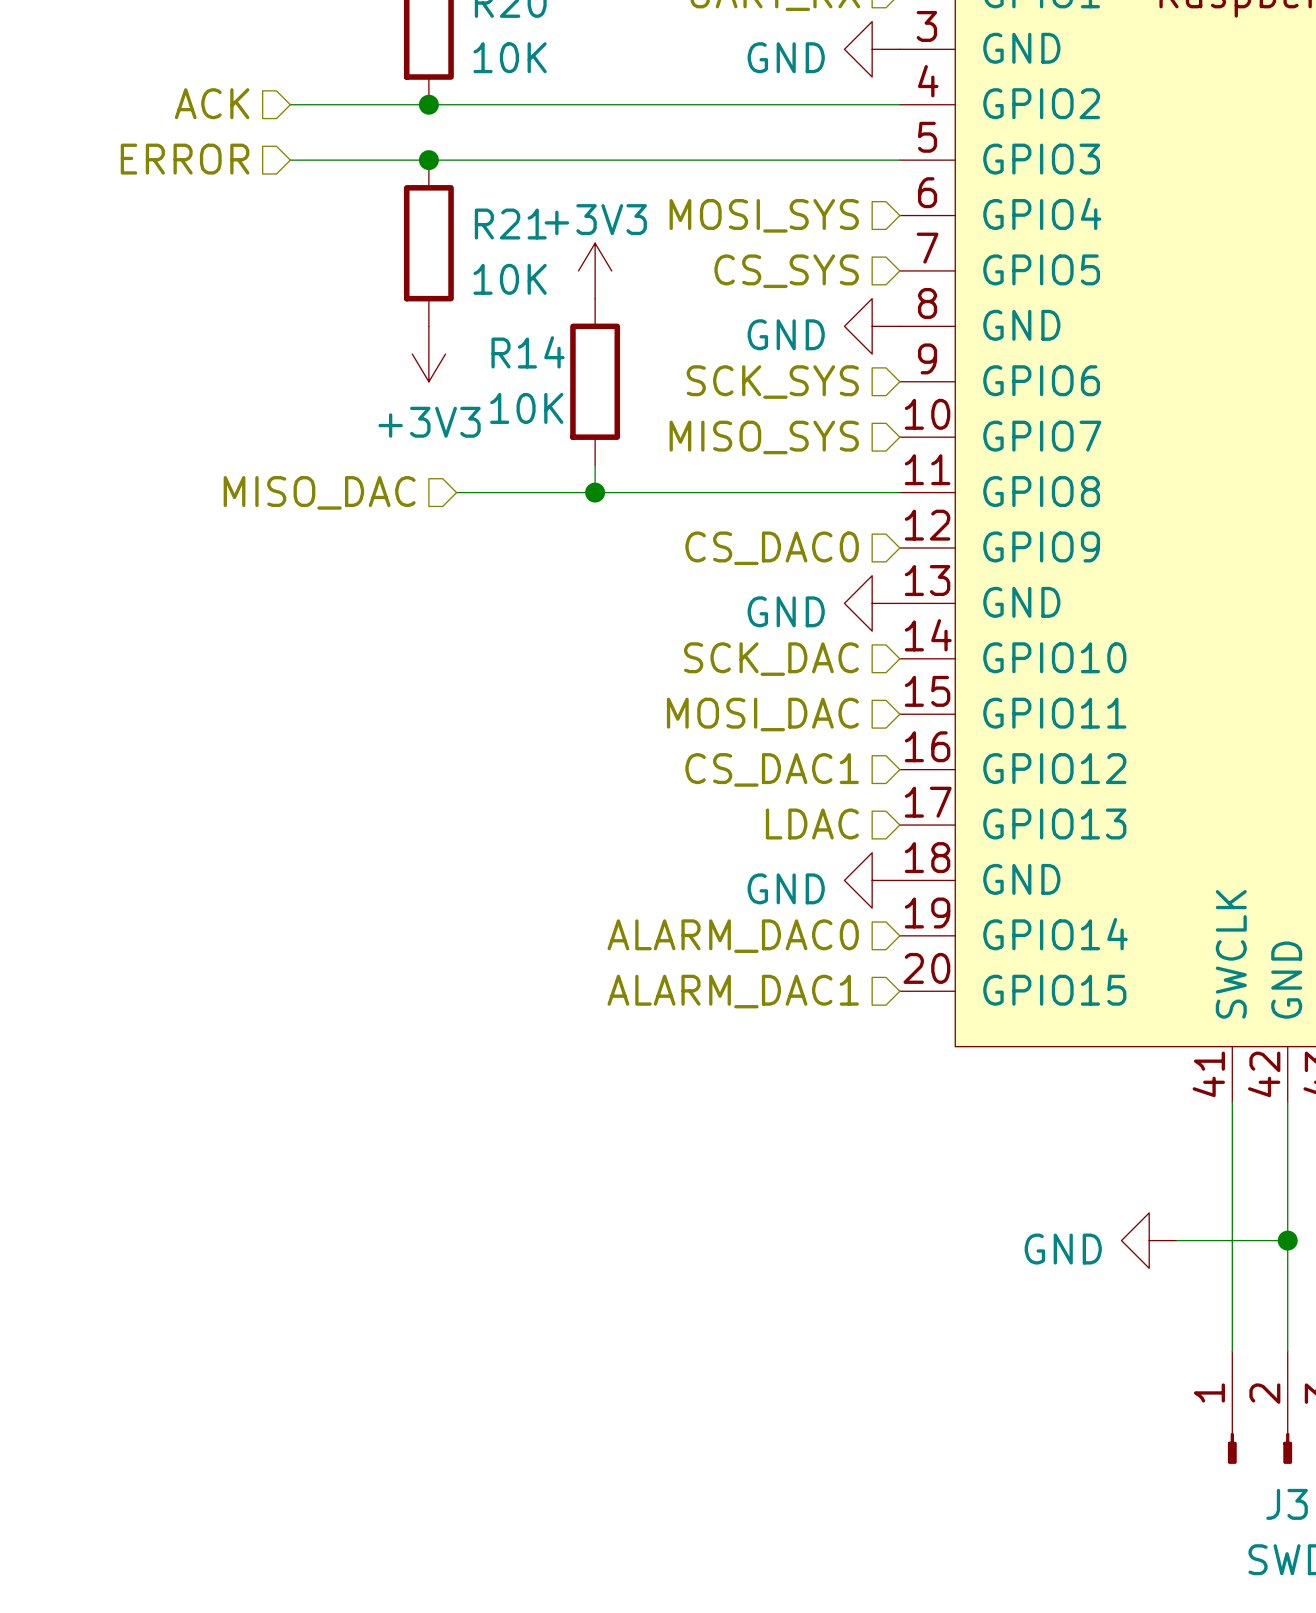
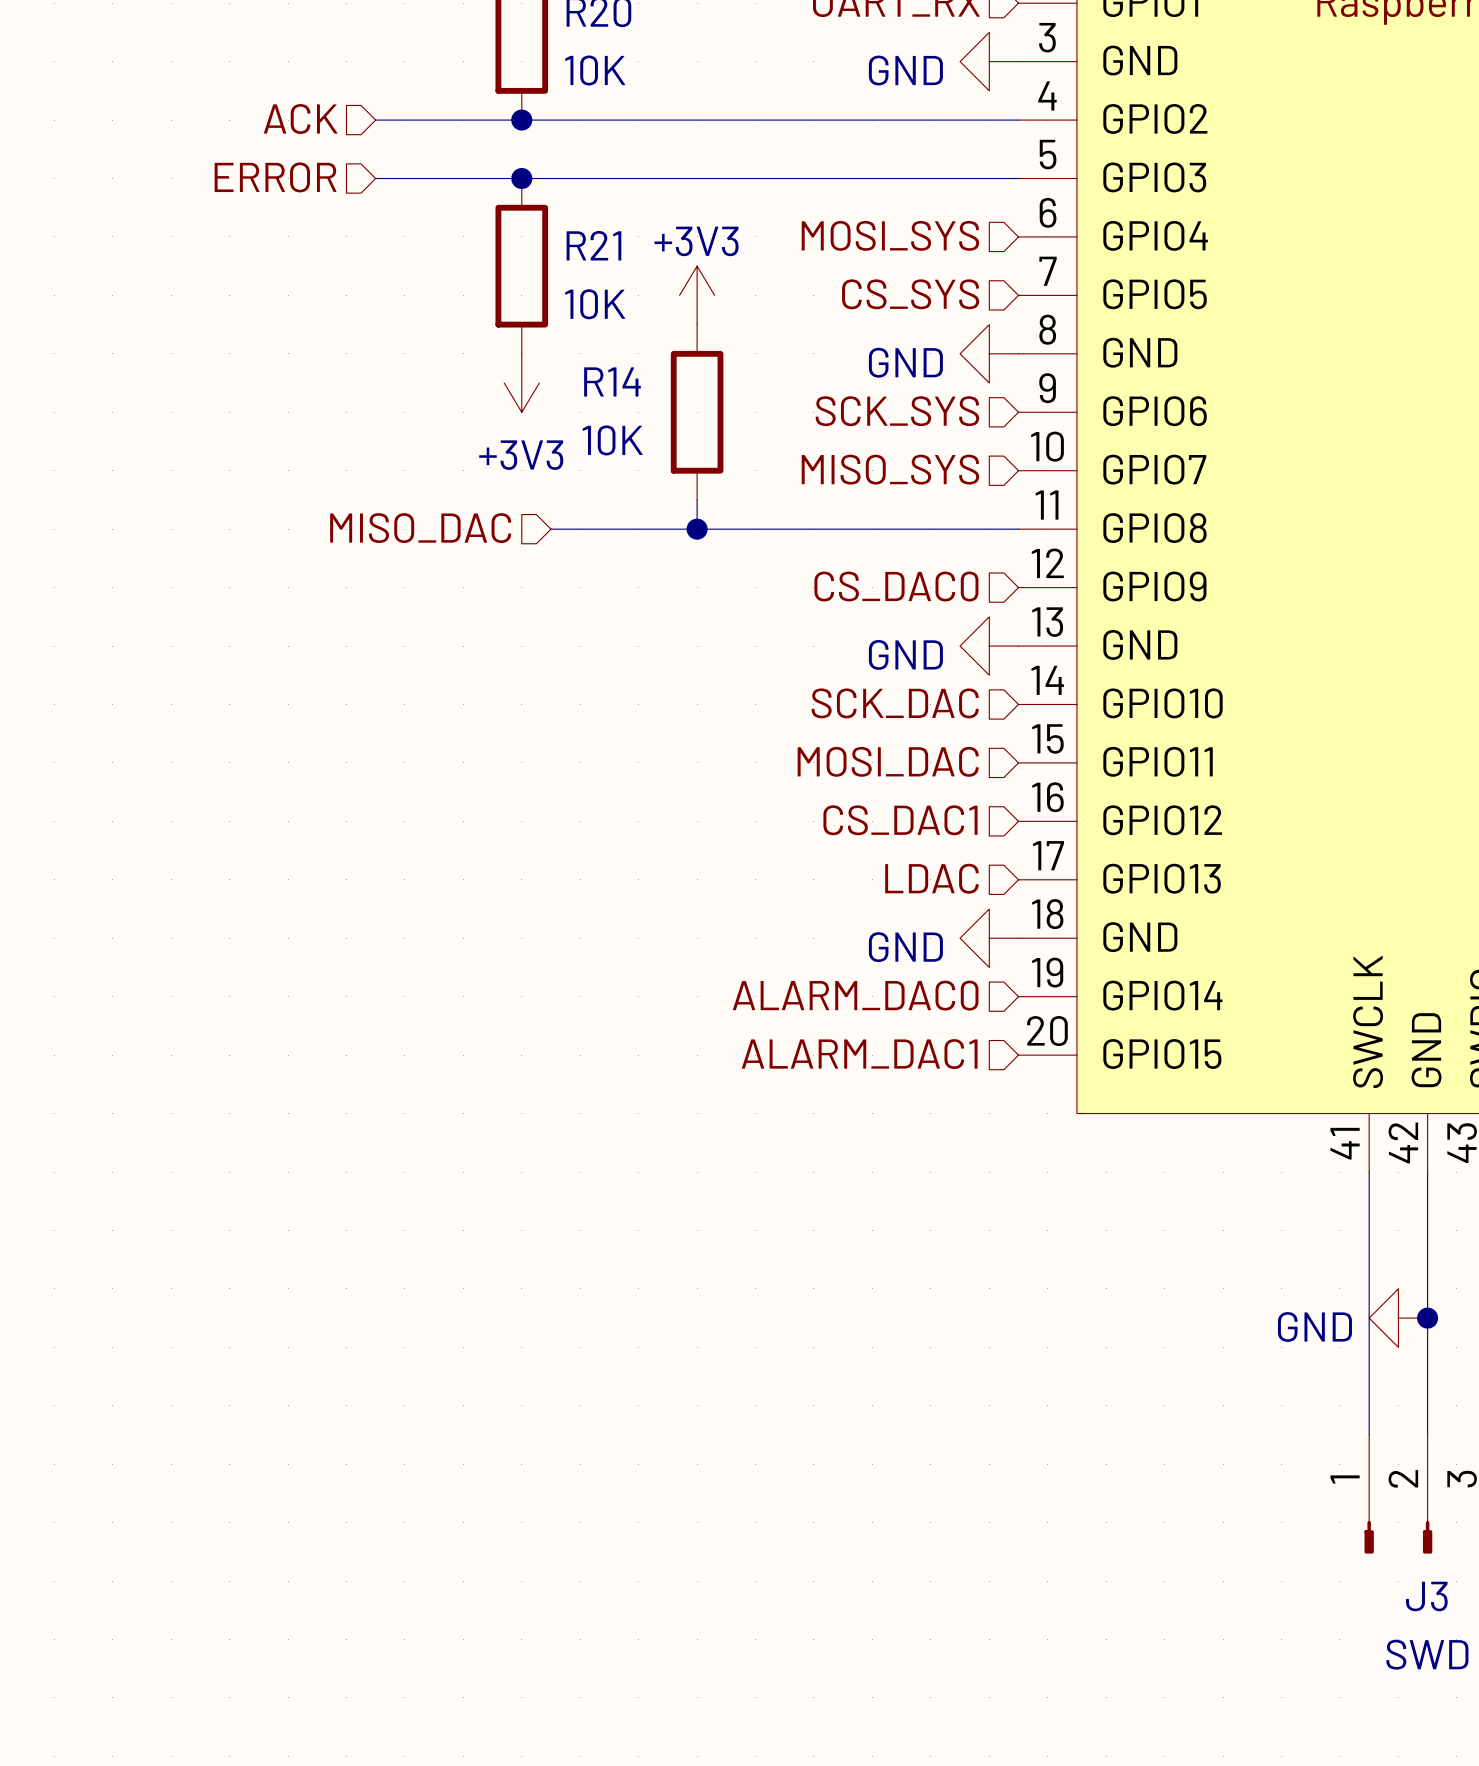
power symbol position: GND (1149, 1240) -> GND (1398, 1318)
wire: (1176, 1240) (1287, 1240) -> none

